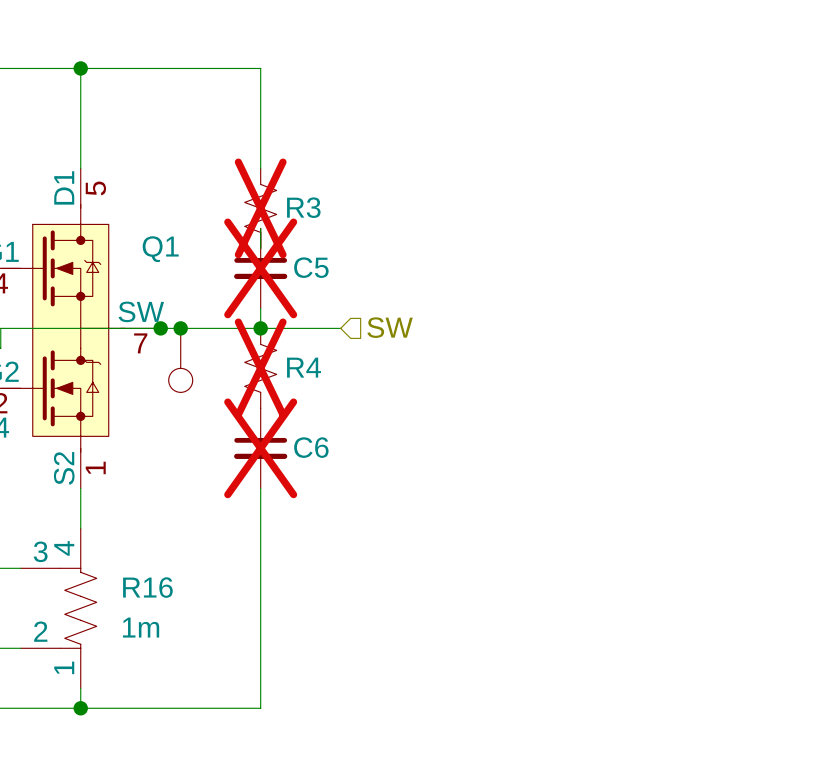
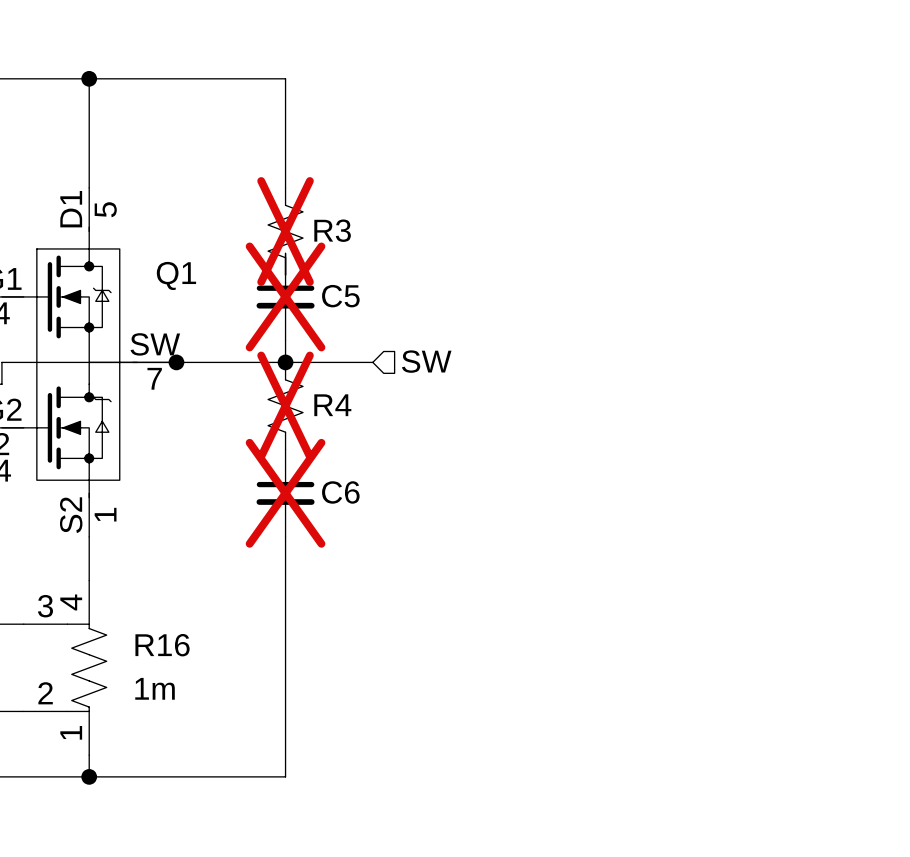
junction: (180, 328) -> none
part: (180, 360) -> none

